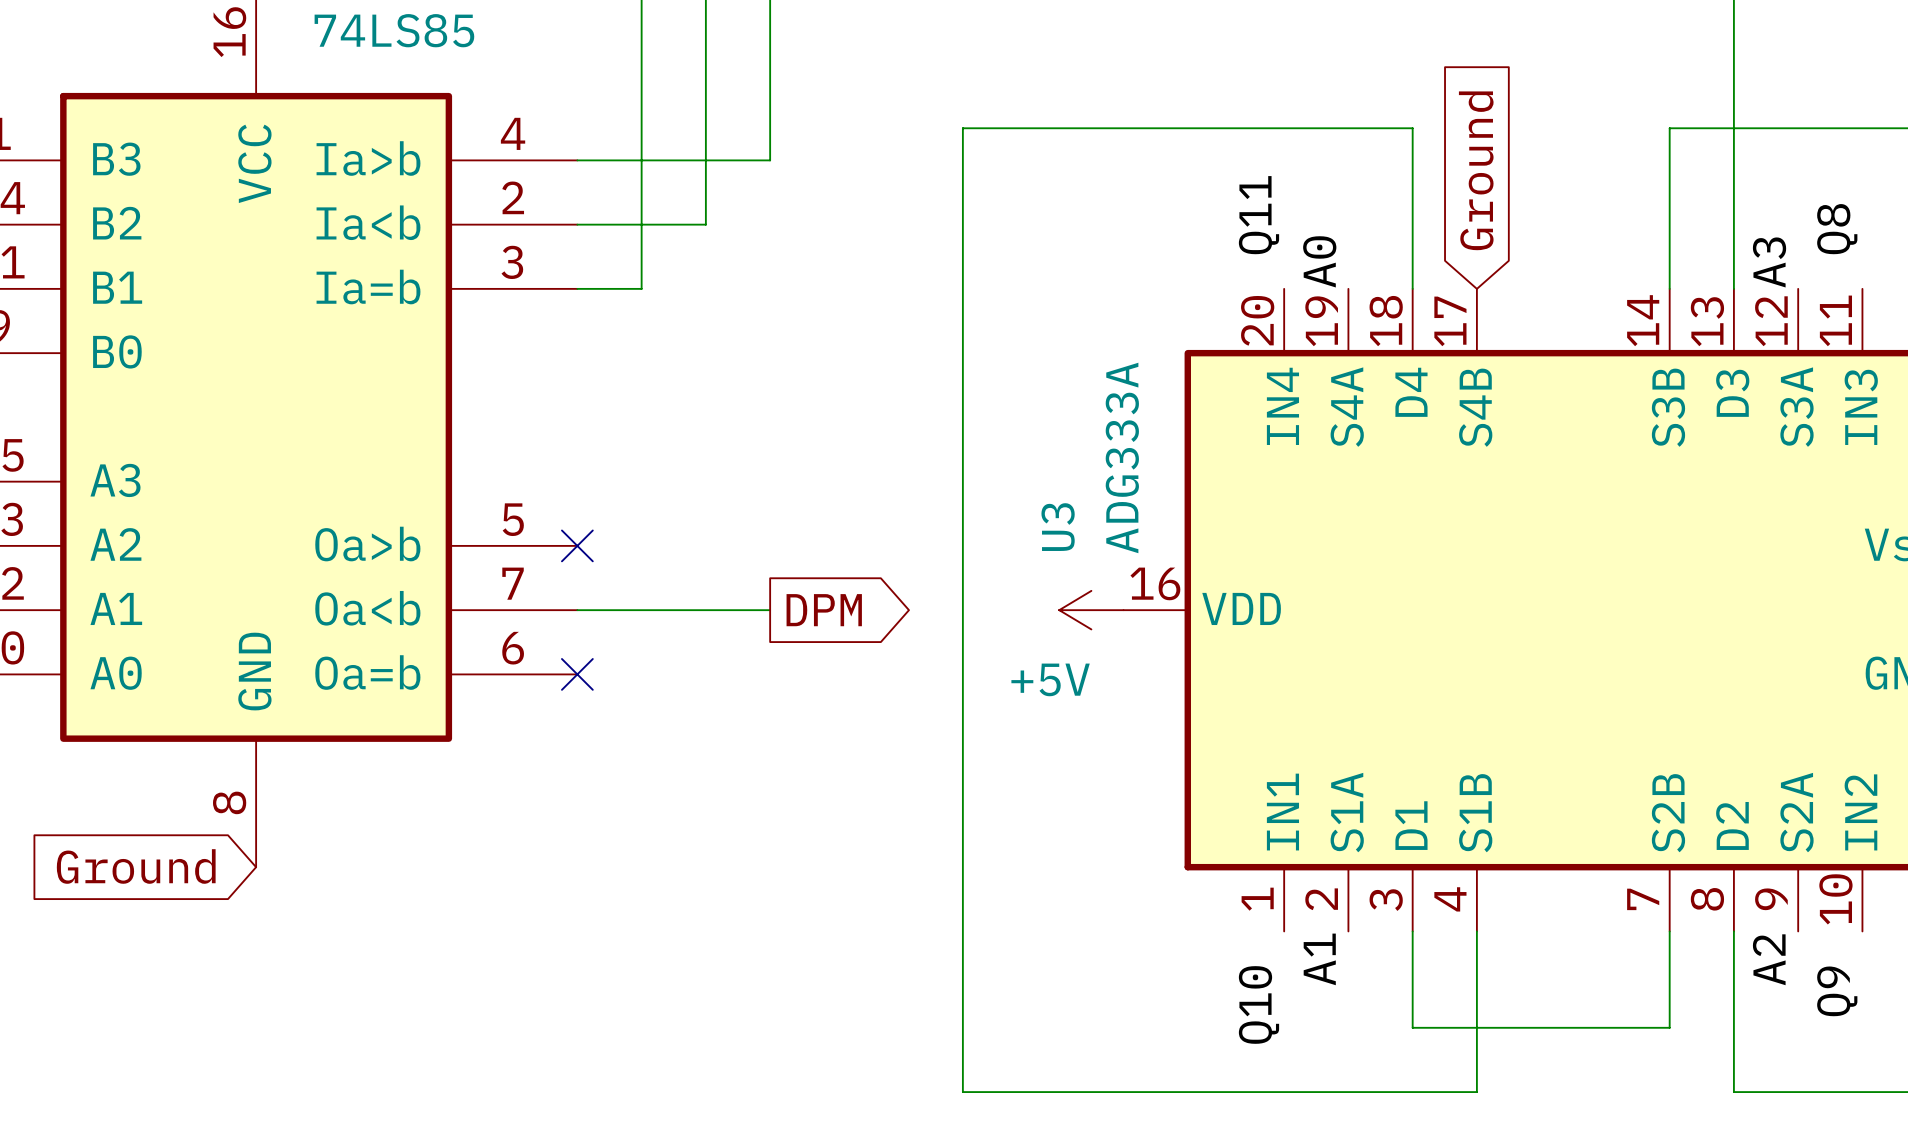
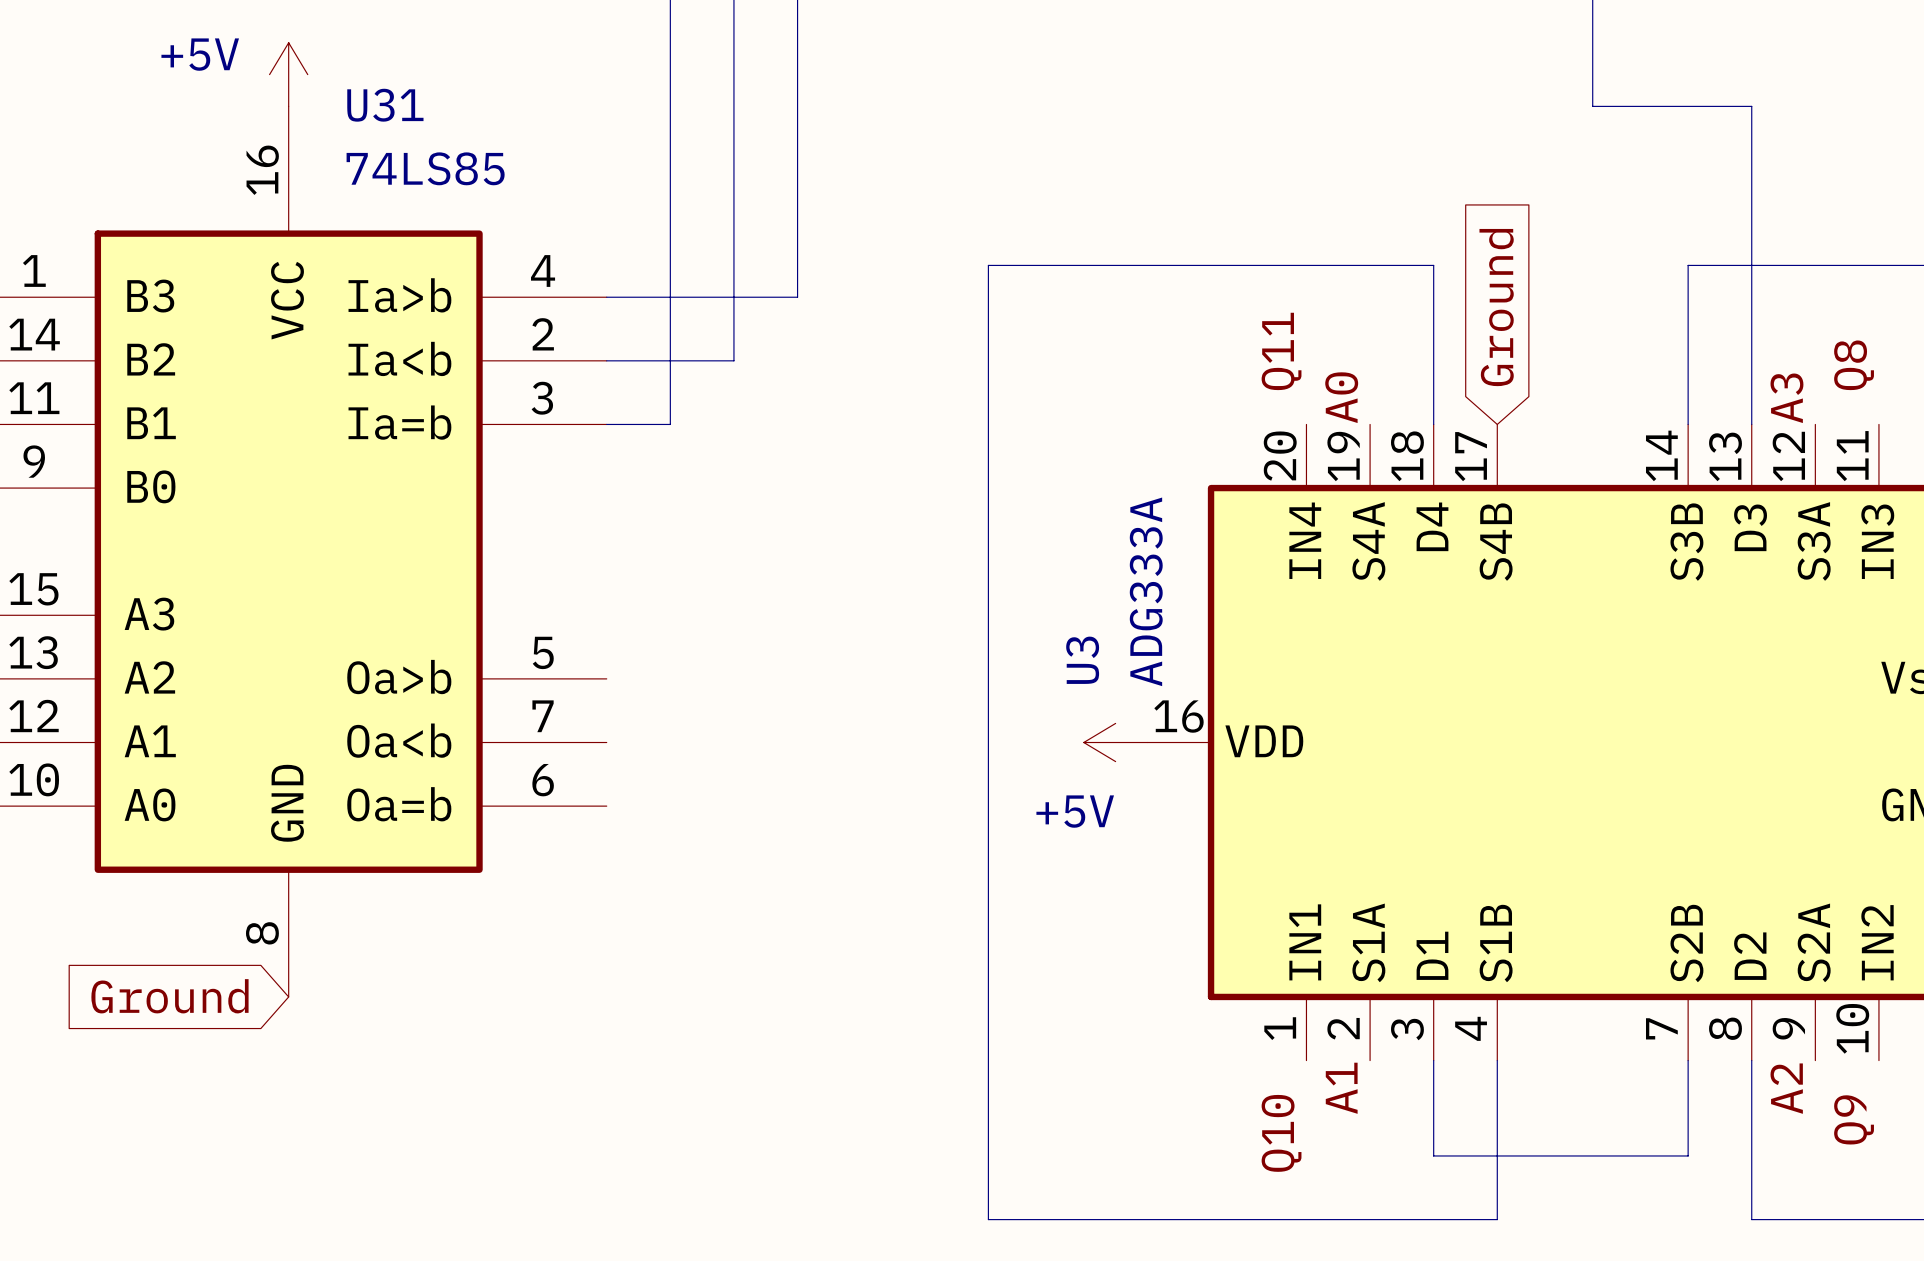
no-connect mark: (577, 545) -> none
wire: (577, 610) (770, 610) -> none
global label: DPM (824, 610) -> none
no-connect mark: (577, 674) -> none

